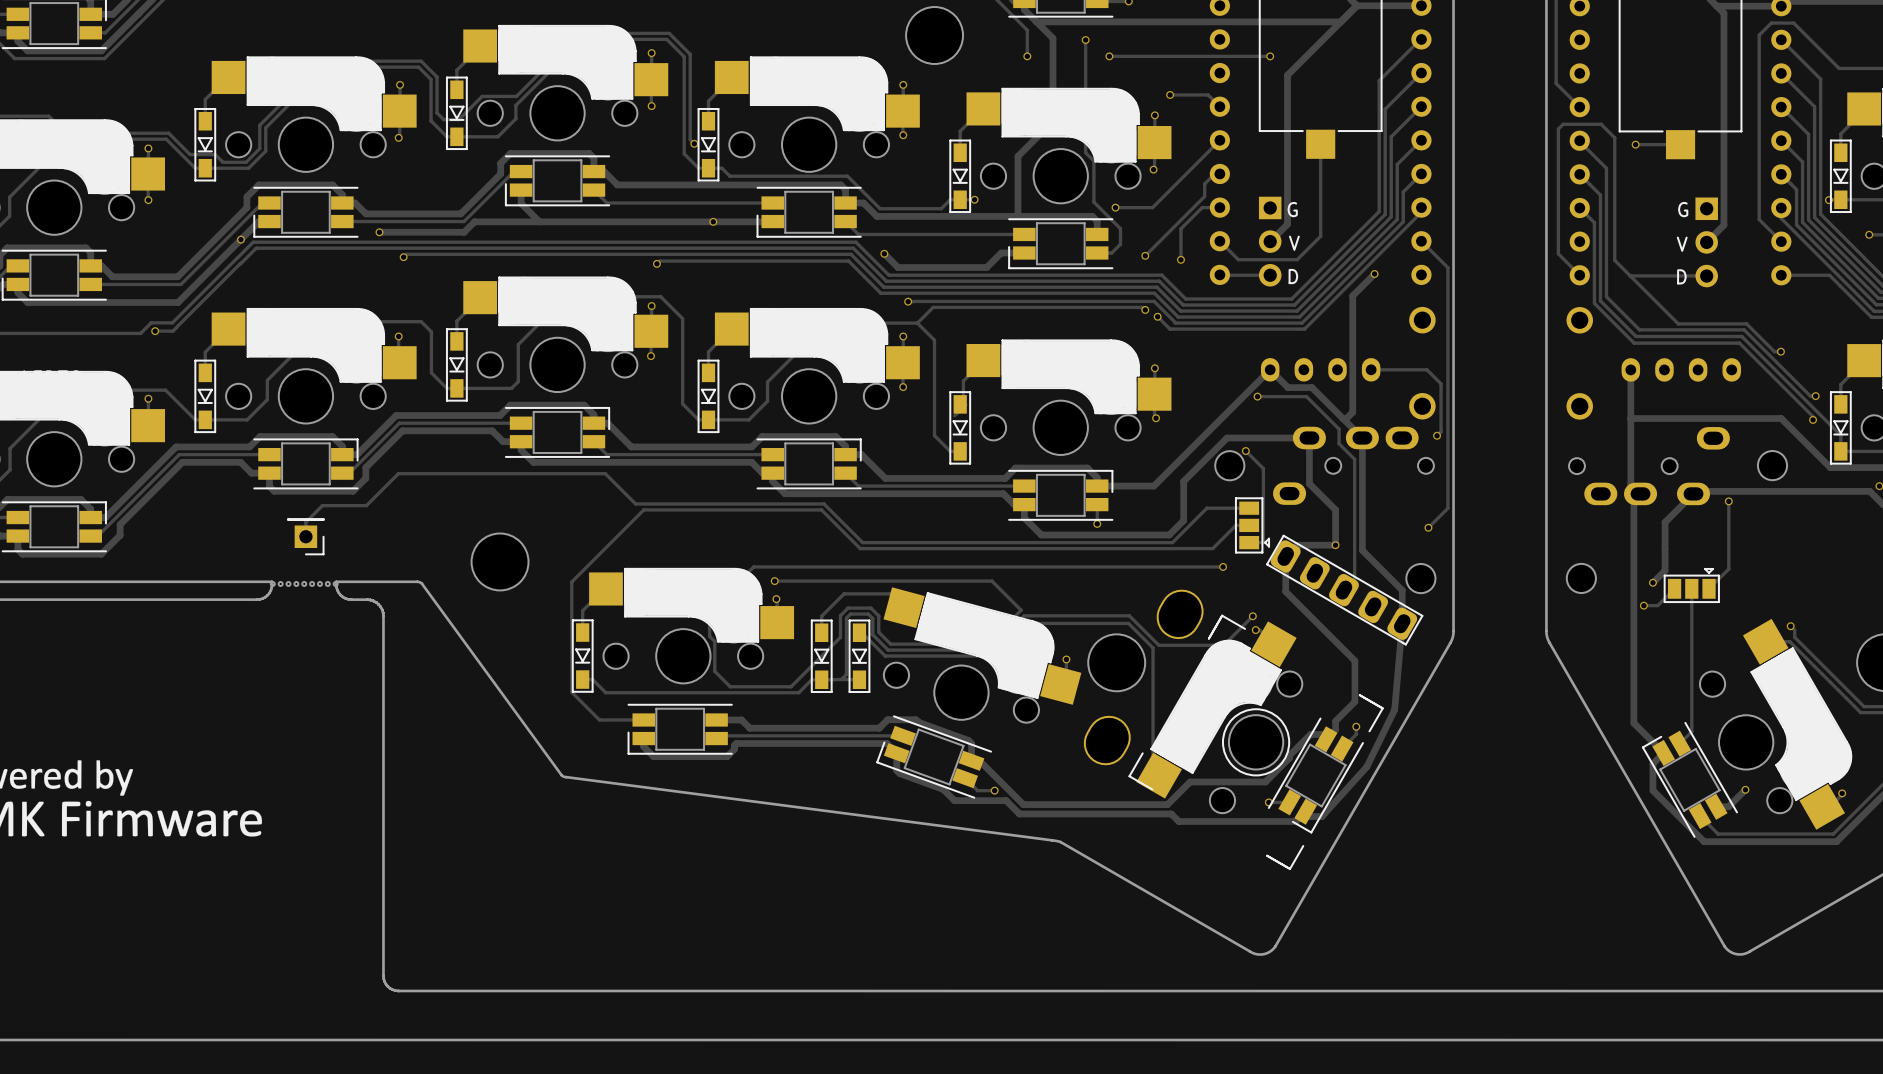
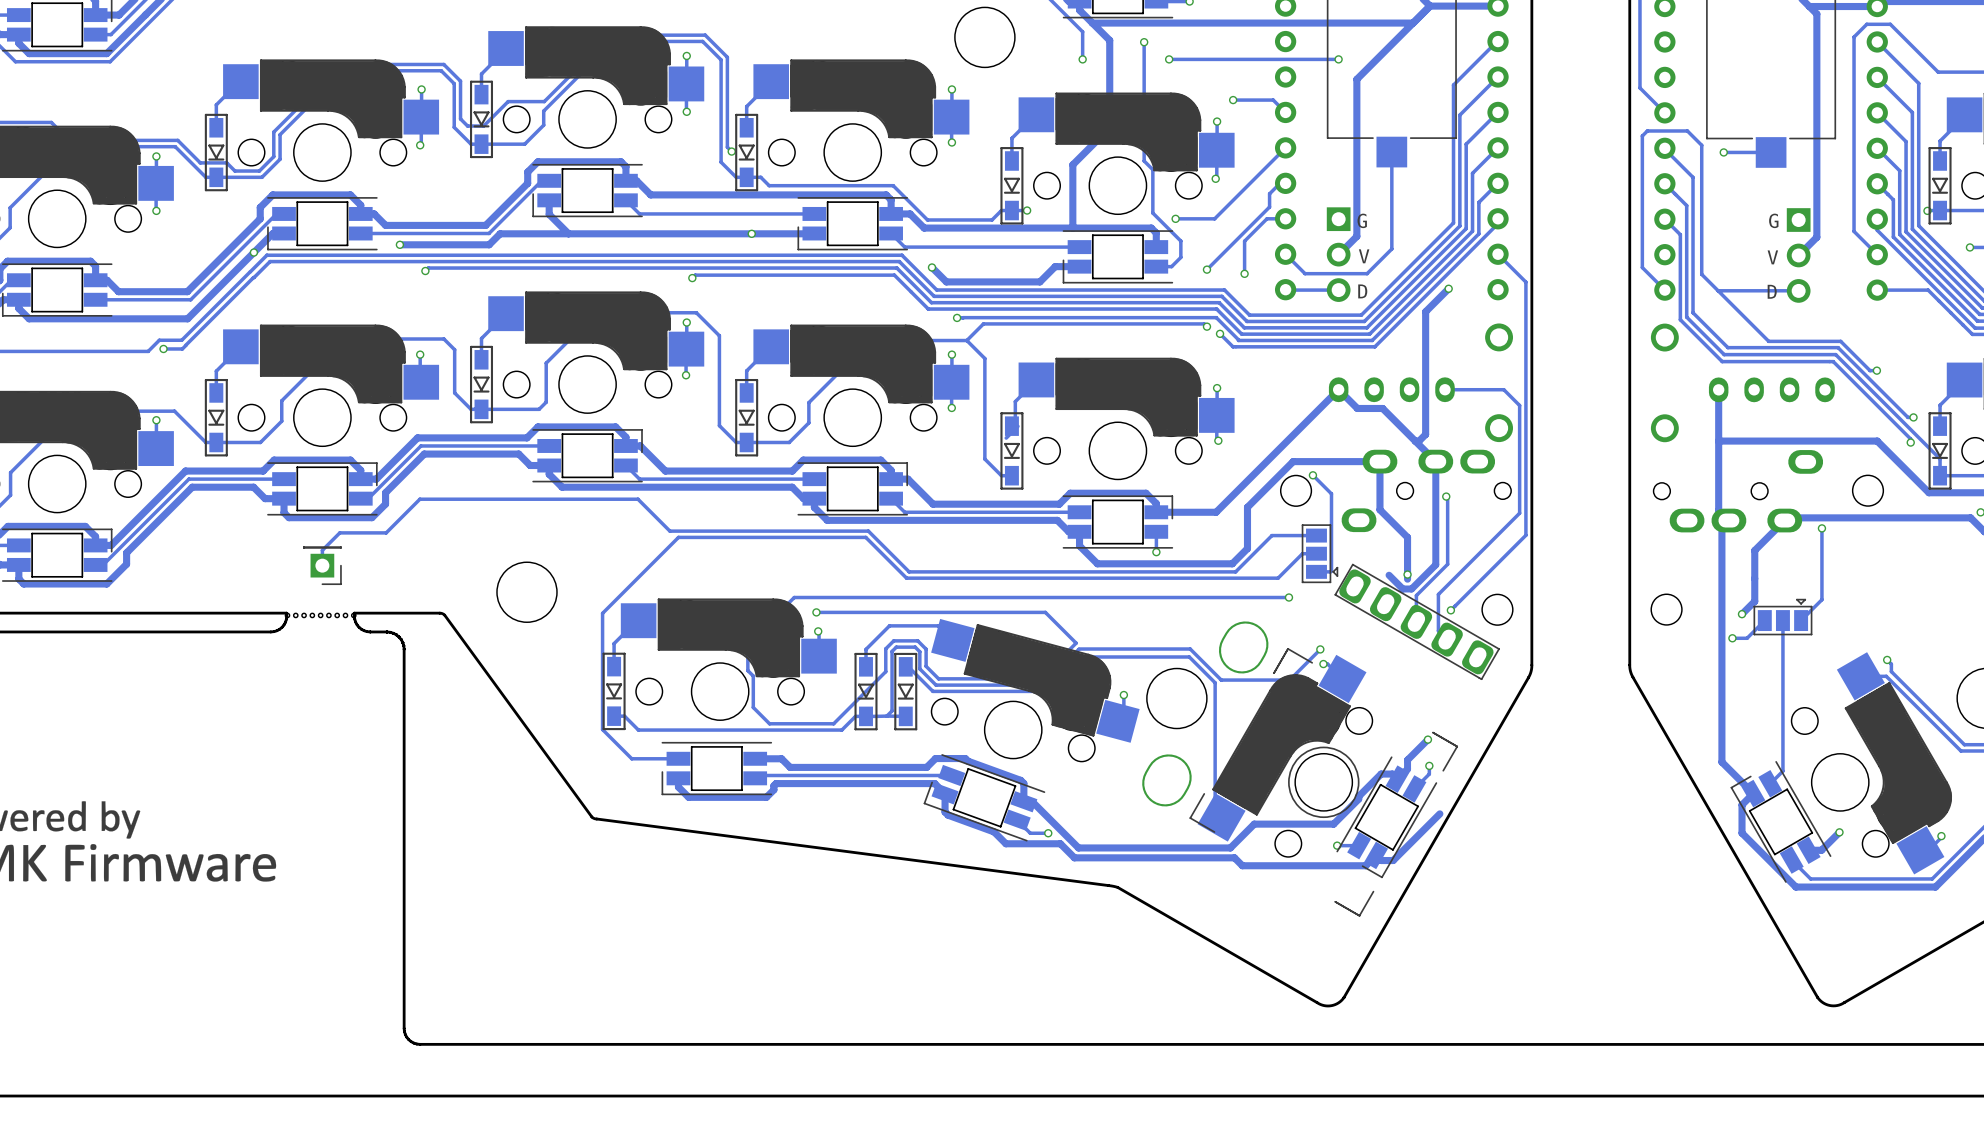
track: (1441, 383) (1441, 431) (1437, 435) -> (1518, 404) (1519, 513) (1438, 594) (1438, 630) (1447, 639)
track: (1257, 396) (1306, 396) (1339, 429) (1339, 443) (1354, 459) (1354, 579) (1343, 590) -> (1446, 496) (1447, 564) (1416, 595) (1416, 621)
via: (1257, 396) -> none
via: (1437, 435) -> none
via: none -> (1446, 496)
track: (1447, 507) (1428, 527) -> (1525, 535) (1450, 610)
via: (1428, 527) -> none
track: (1362, 535) (1362, 550) (1402, 590) (1402, 623) (1394, 709) (1366, 766) (1321, 816) -> (1439, 813) (1393, 860)
track: none -> (1435, 564) (1411, 588) (1402, 588) (1389, 575)
track: (1335, 545) (1296, 545) (1285, 556) (1285, 591) (1354, 660) (1354, 701) -> (1407, 574) (1407, 579)
via: none -> (1450, 610)
via: none -> (1427, 739)

